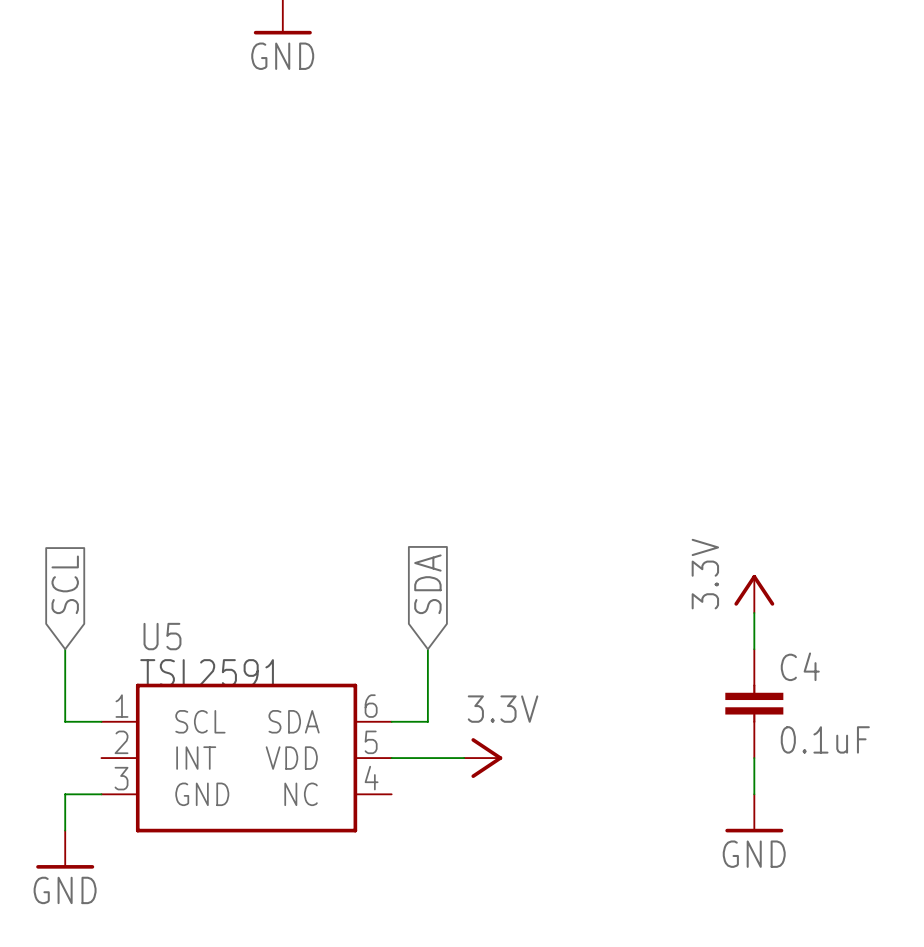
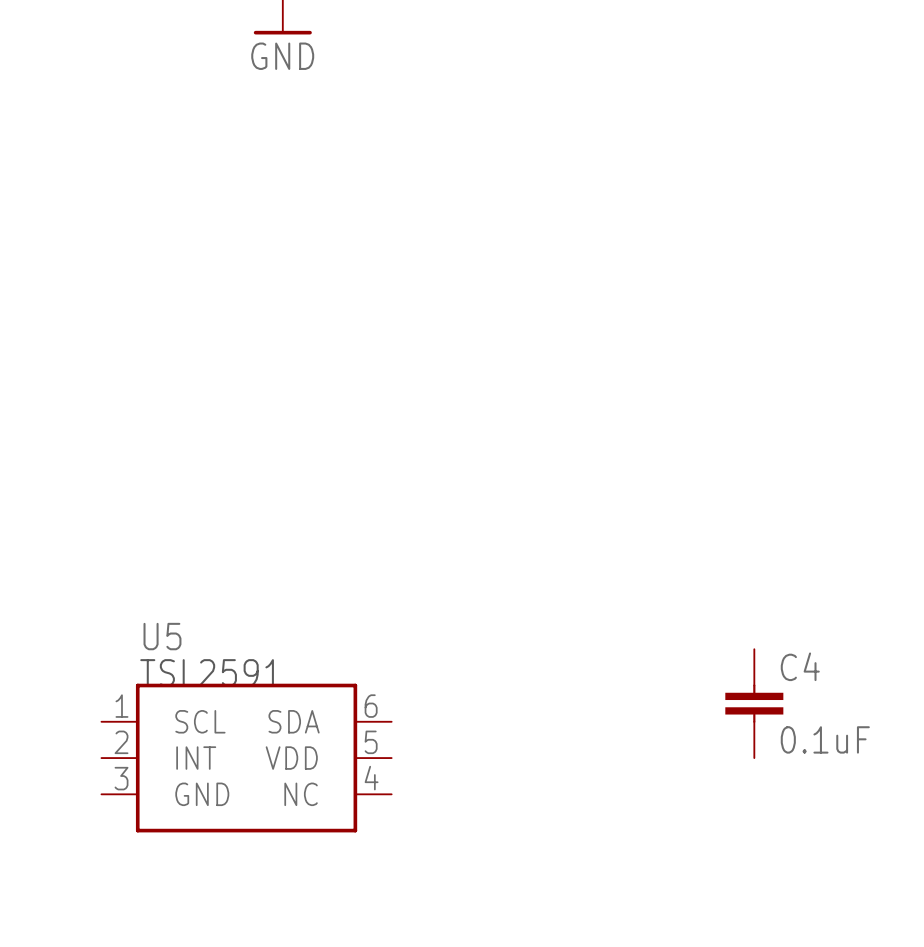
global label: SCL (65, 584) -> none
global label: SDA (427, 584) -> none
power symbol: 3.3V (754, 593) -> none
wire: (754, 612) (754, 649) -> none
wire: (65, 649) (65, 721) (101, 721) -> none
wire: (427, 649) (427, 721) (391, 721) -> none
wire: (391, 758) (464, 758) -> none
power symbol: 3.3V (483, 758) -> none
wire: (754, 758) (754, 794) -> none
wire: (101, 794) (65, 794) (65, 830) -> none
power symbol: GND (754, 813) -> none
power symbol: GND (65, 849) -> none

